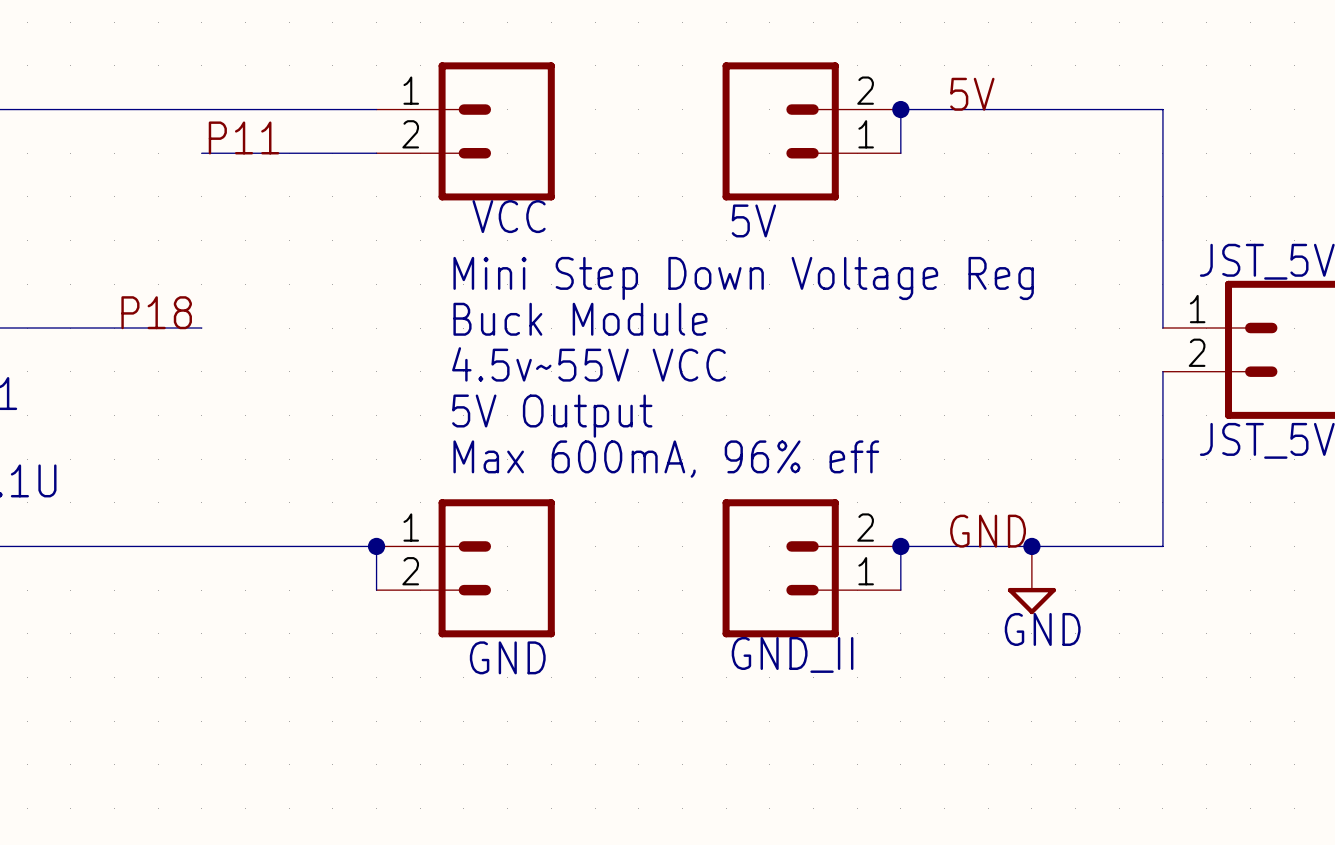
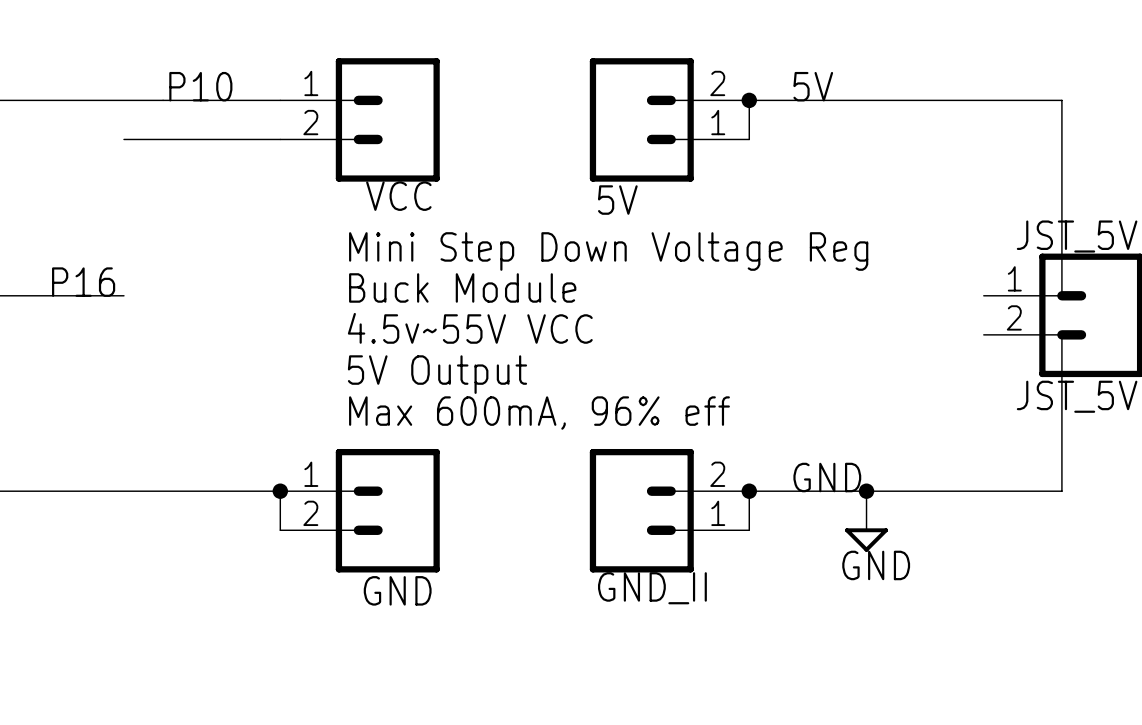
wire: (1162, 109) (1162, 328) -> (983, 100) (1061, 100) (1061, 295)
label: P11 (244, 137) -> P10 (200, 86)
label: P18 (156, 312) -> P16 (83, 282)
wire: (1162, 371) (1162, 546) -> (1061, 334) (1061, 491) (983, 491)

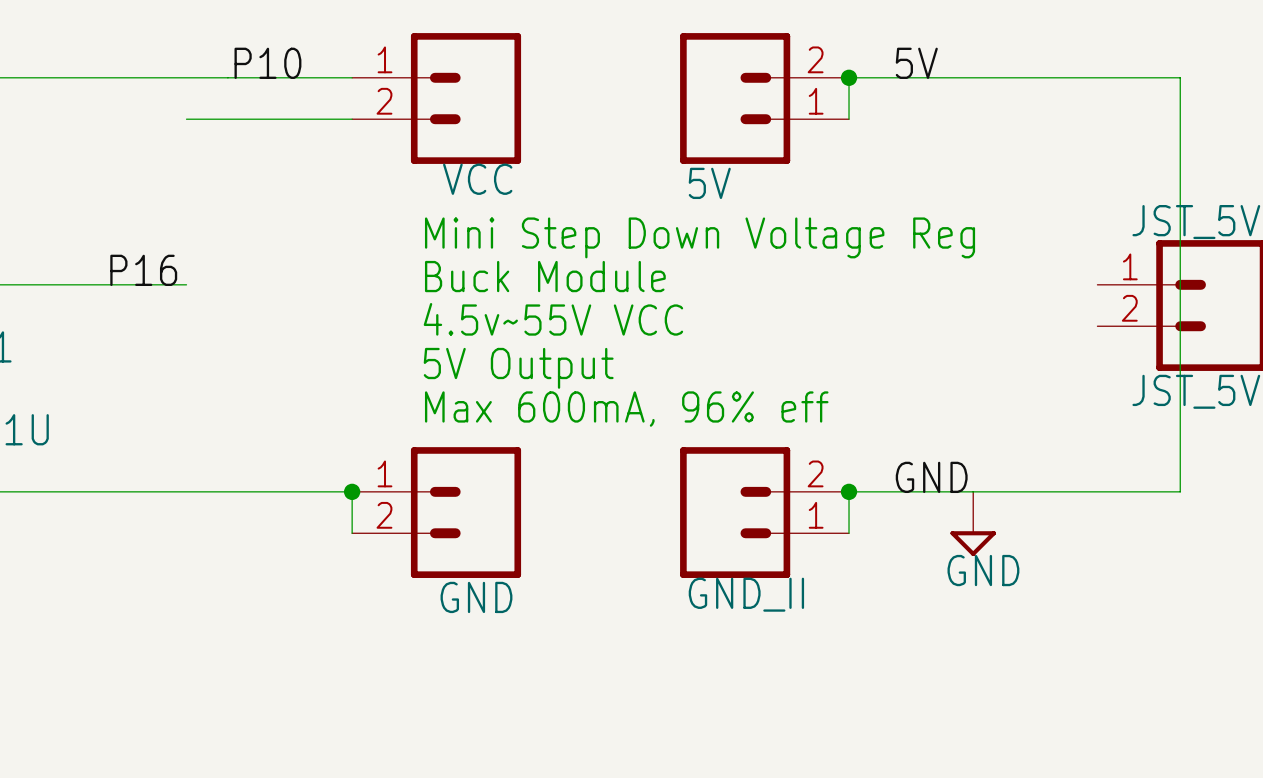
wire: none -> (1180, 284) (1180, 326)
junction: (866, 491) -> none

